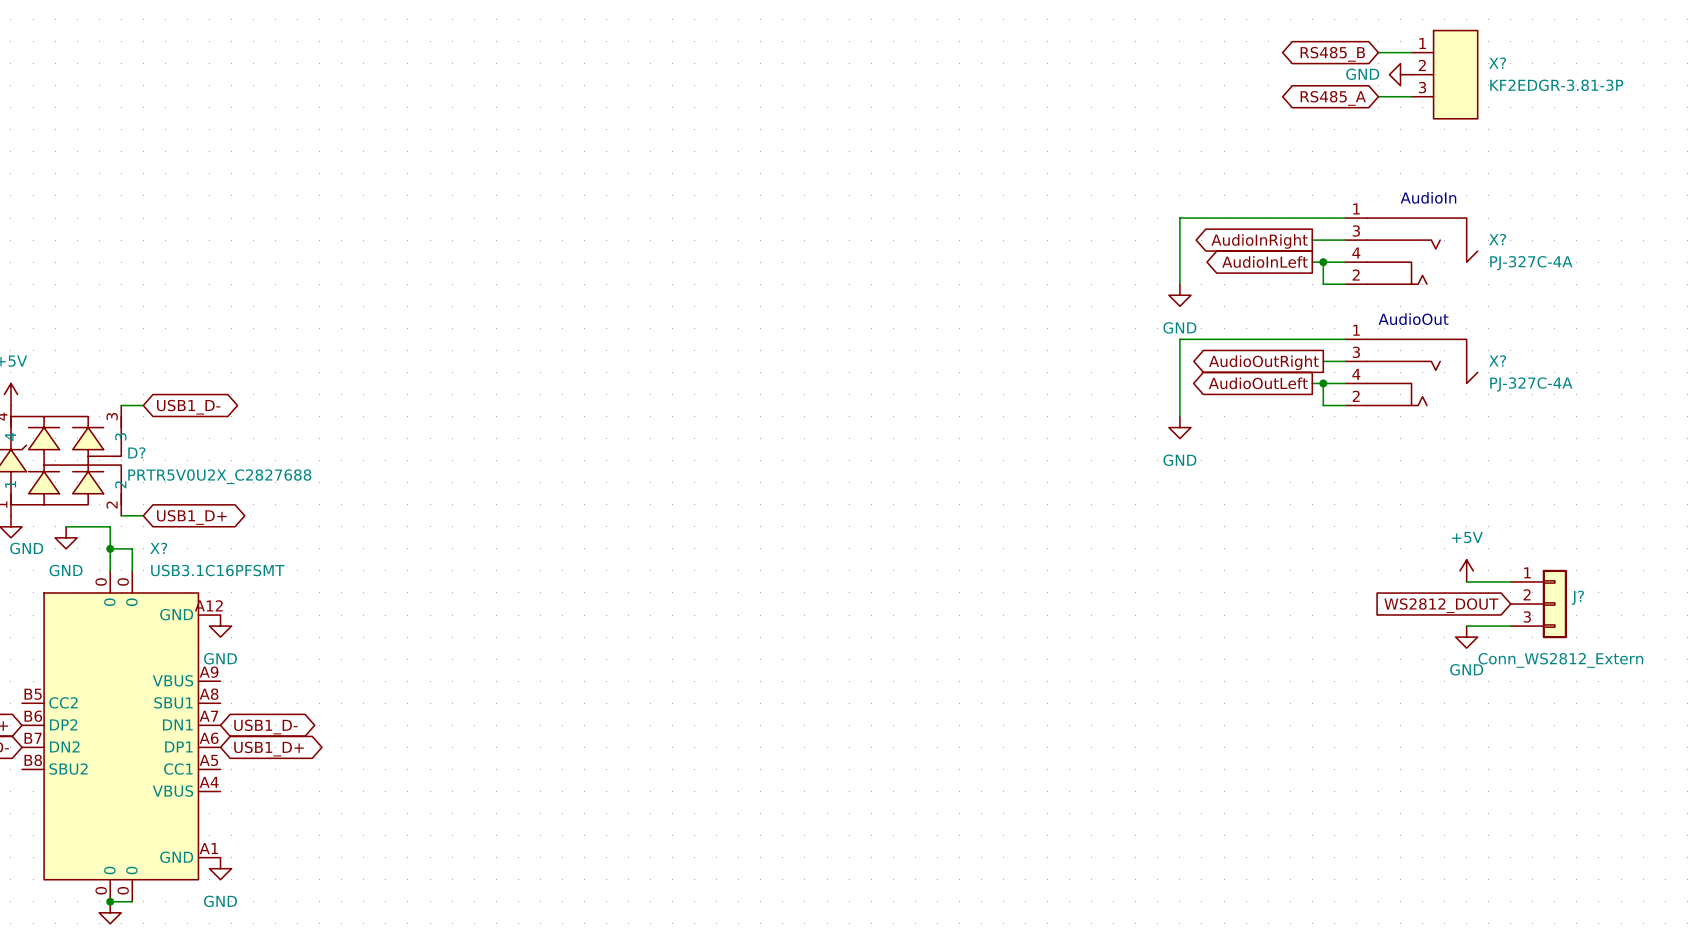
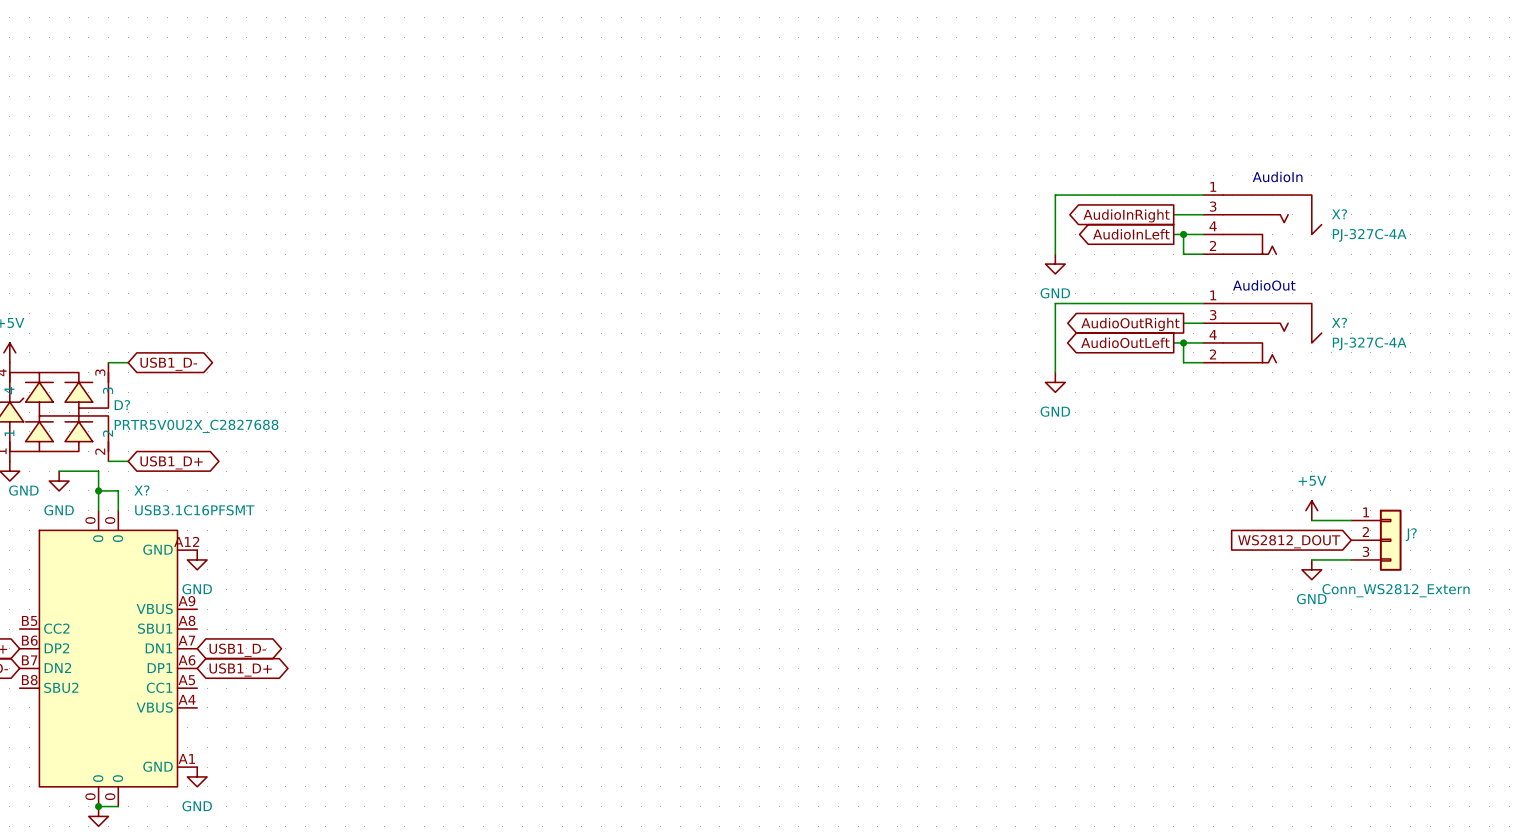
wire: (1378, 52) (1411, 52) -> none
global label: RS485_B (1332, 54) -> none
power symbol: GND (1400, 74) -> none
X?: KF2EDGR-3.81-3P (1444, 74) -> none
wire: (1378, 96) (1411, 96) -> none
global label: RS485_A (1333, 98) -> none

